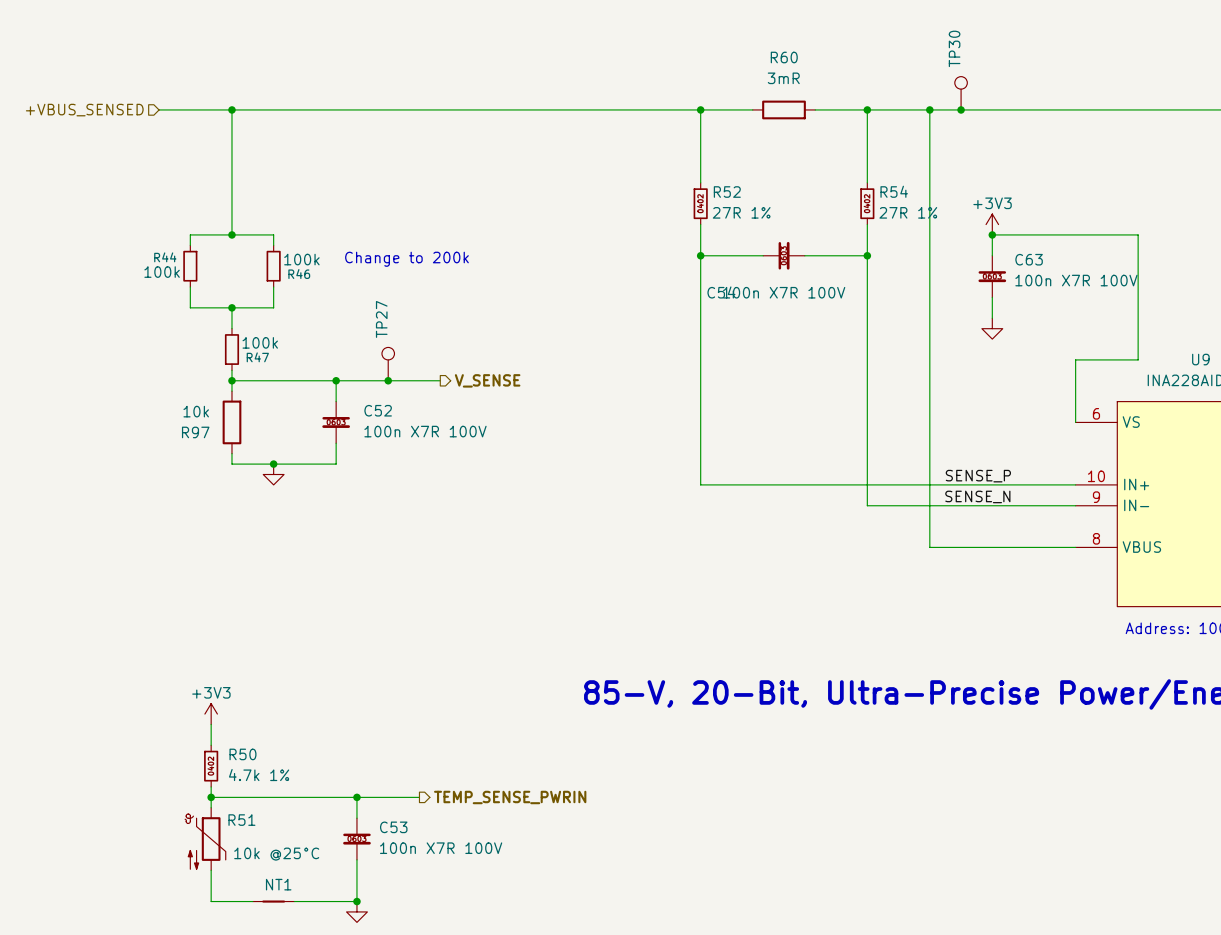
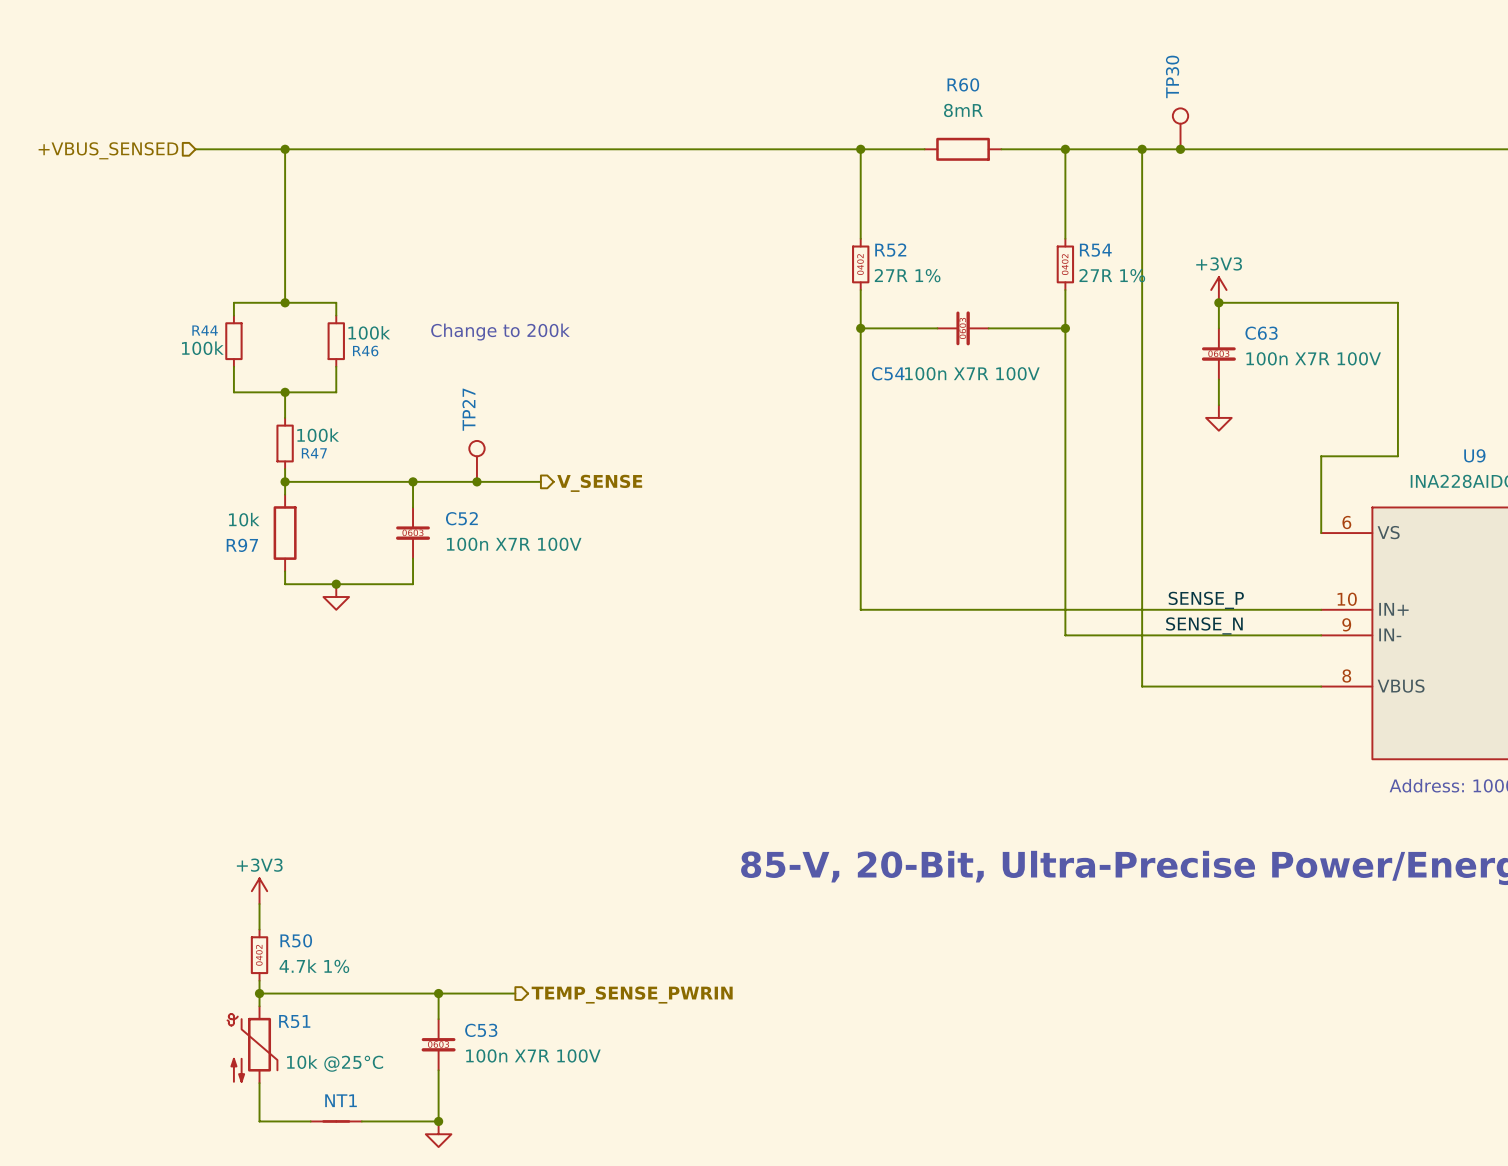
R60 value: 3mR (783, 78) -> 8mR (963, 110)

